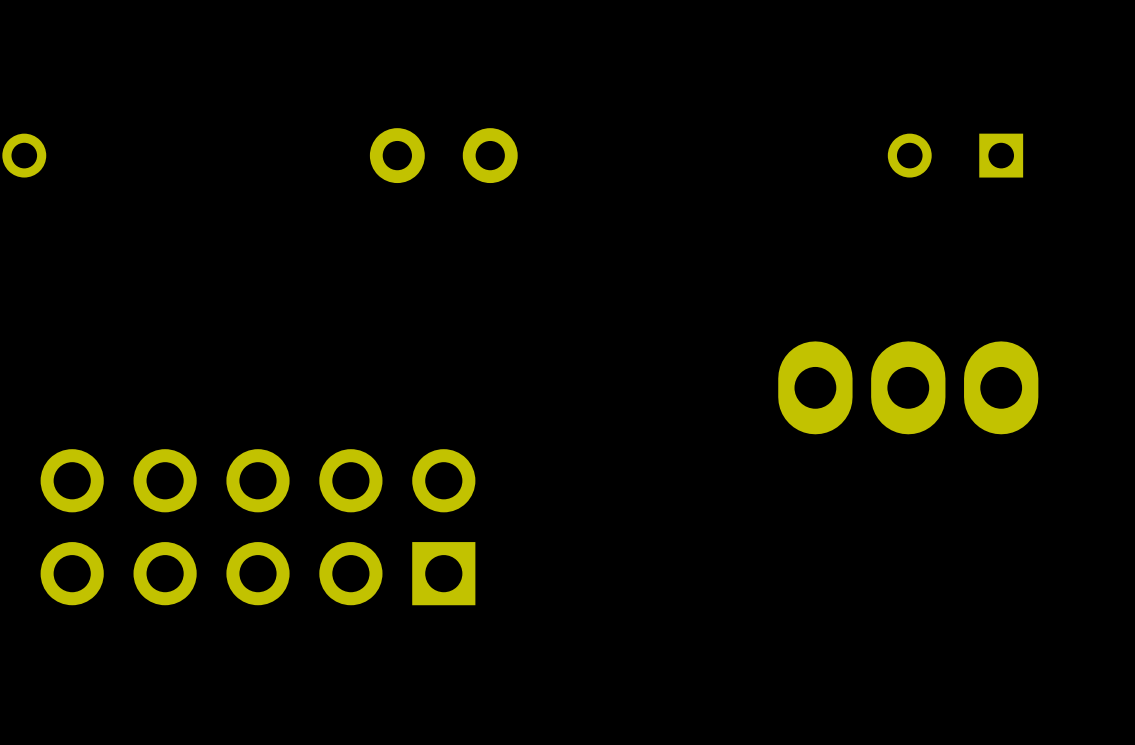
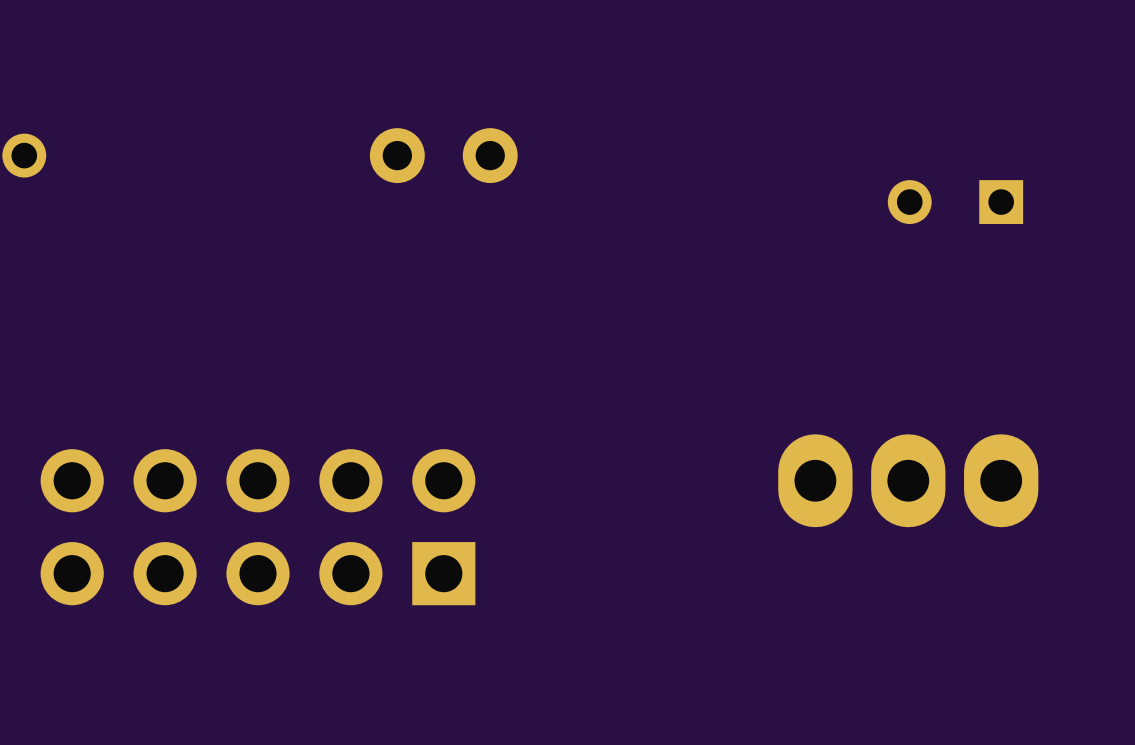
part position: (955, 155) -> (955, 202)
part position: (908, 387) -> (908, 480)

